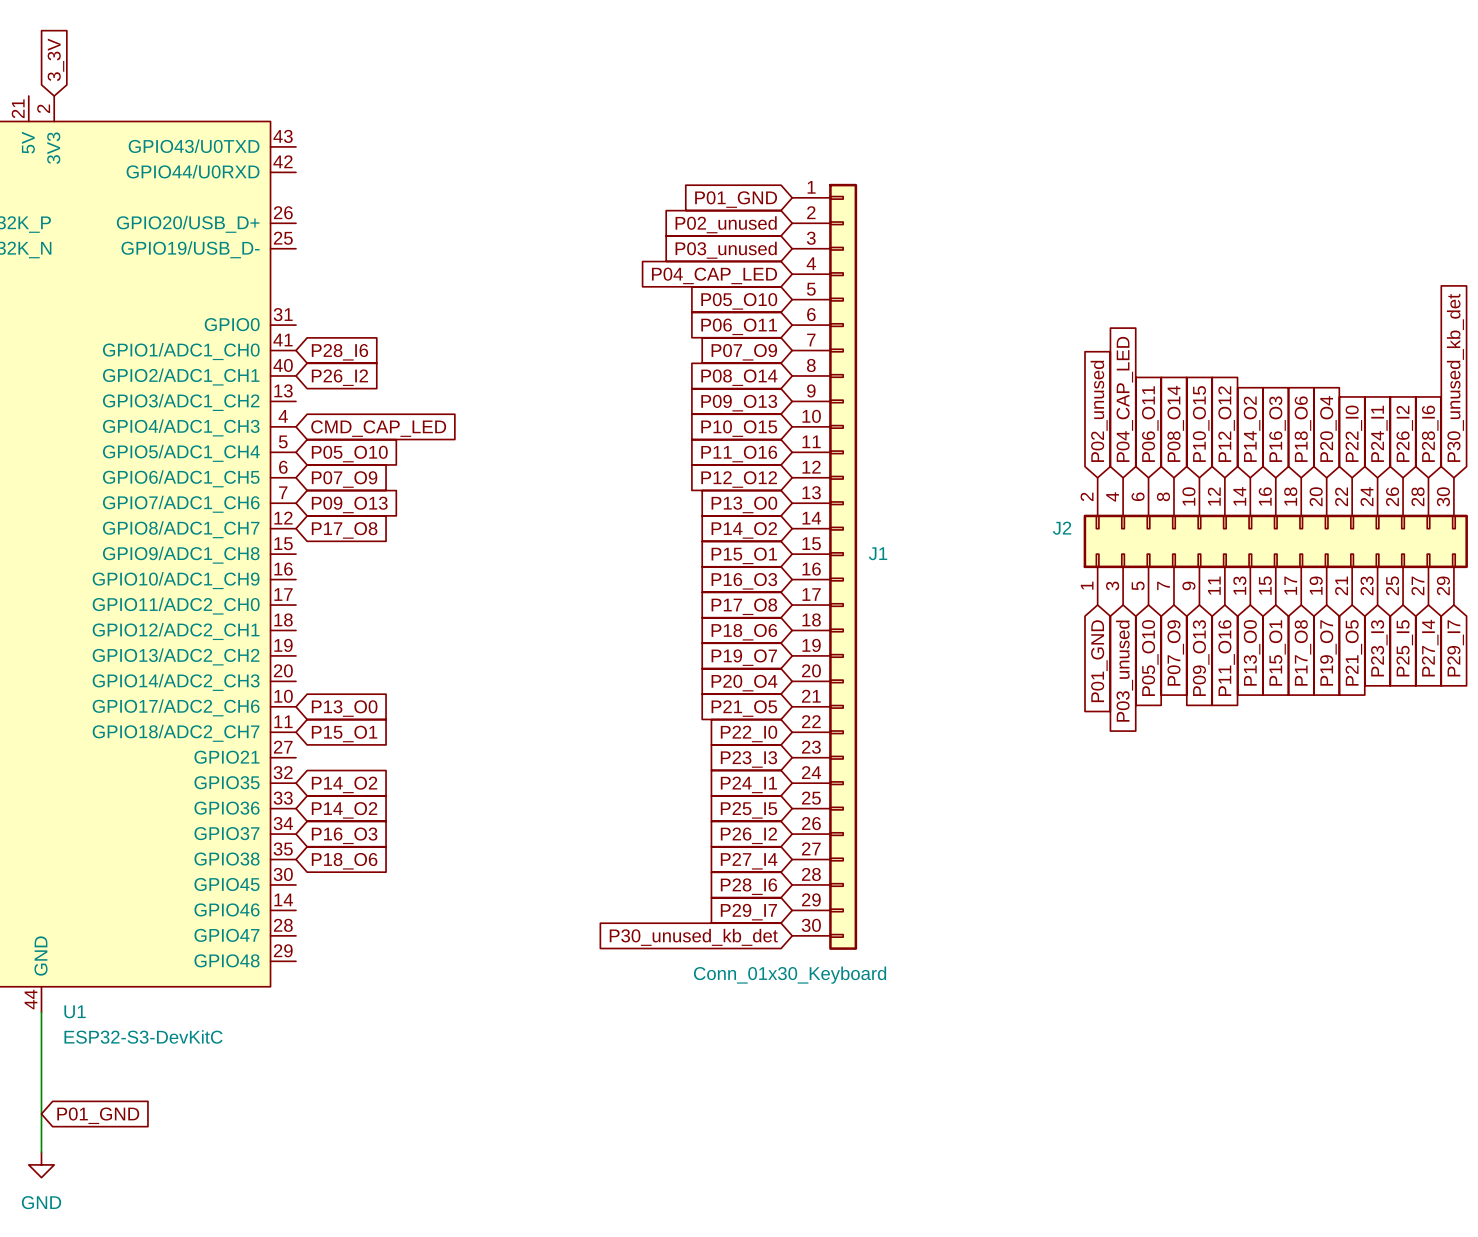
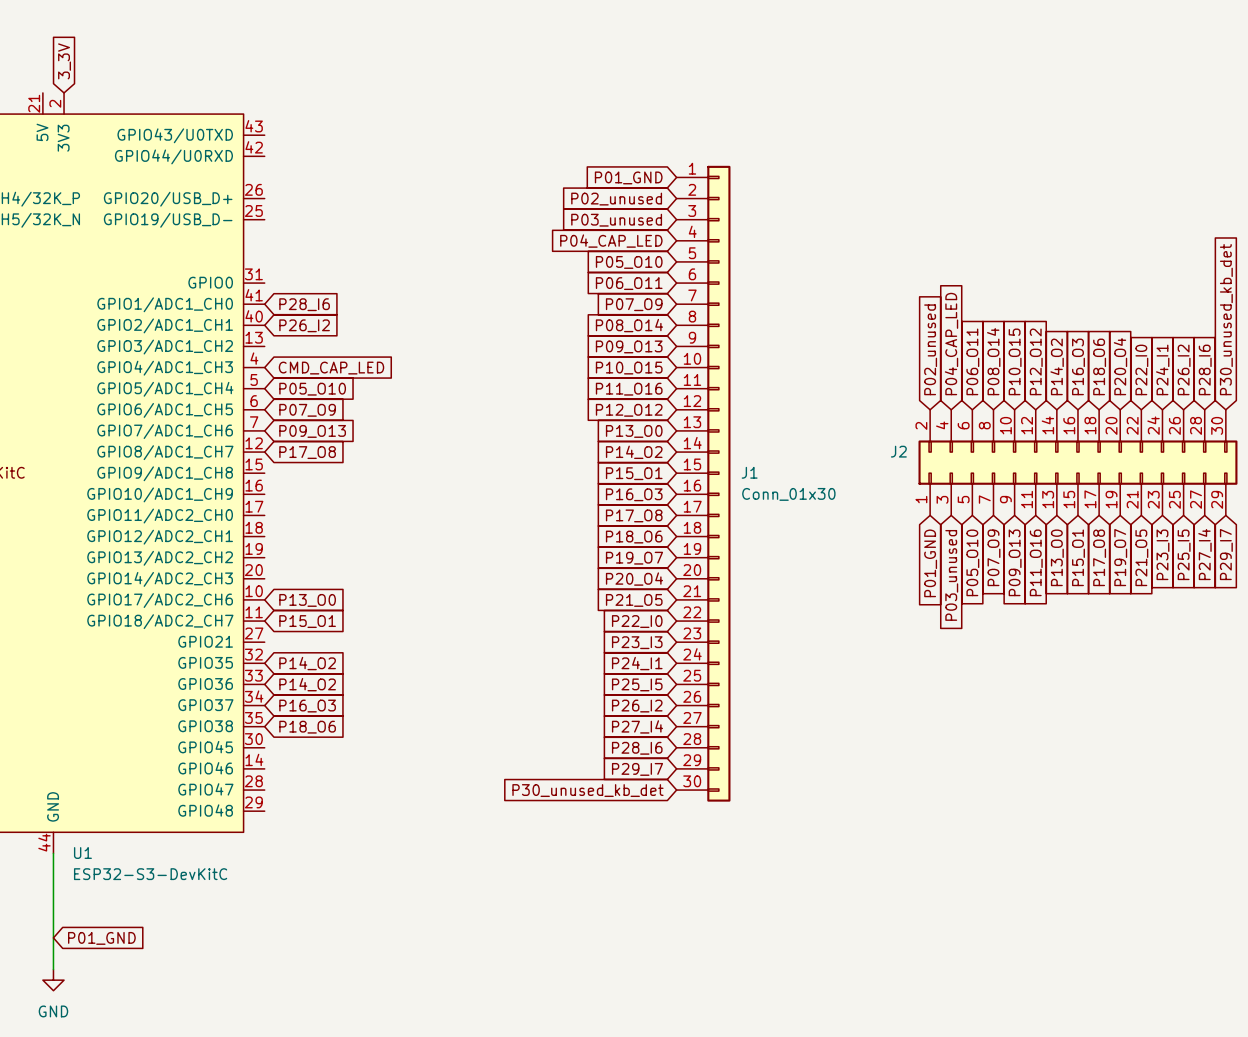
J1 value: Conn_01x30_Keyboard (790, 975) -> Conn_01x30 (788, 494)

